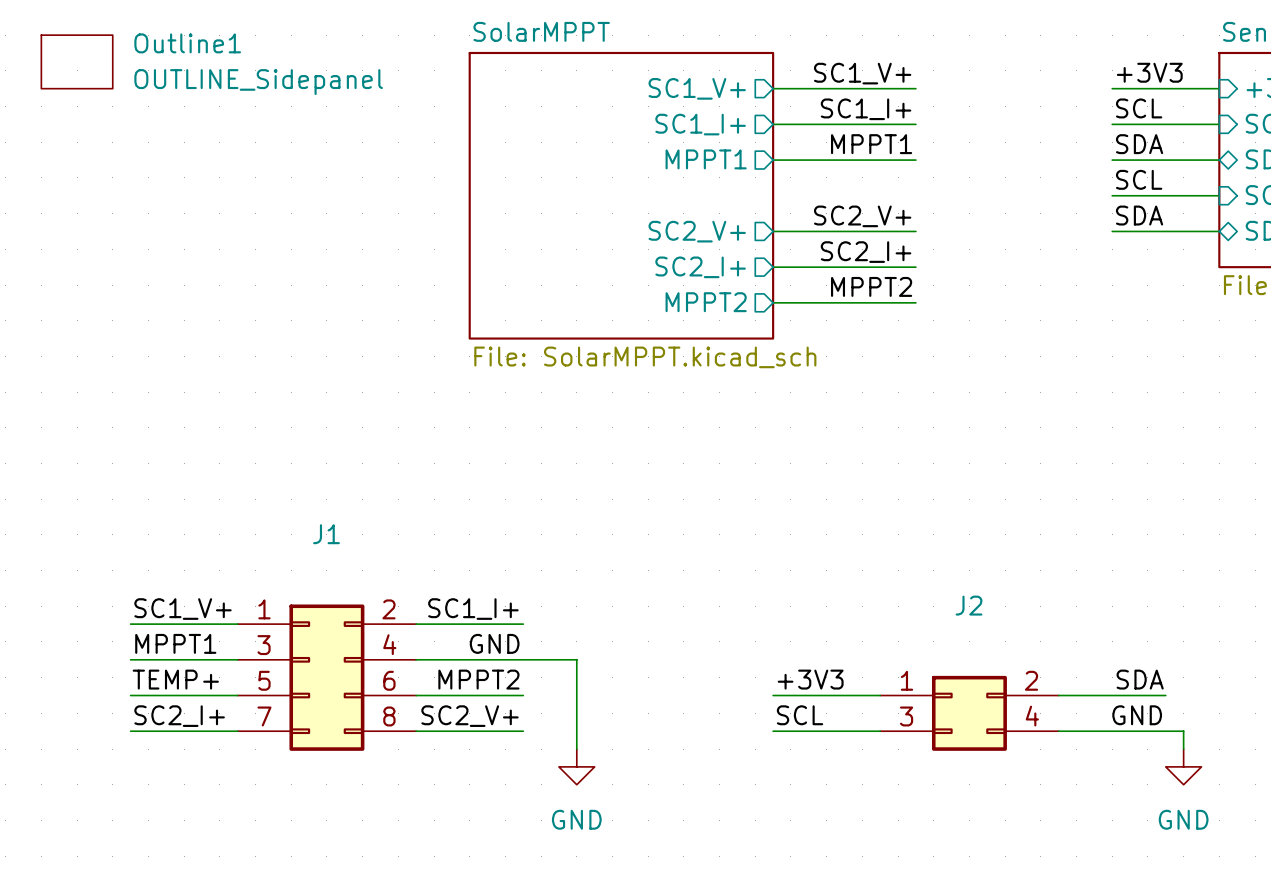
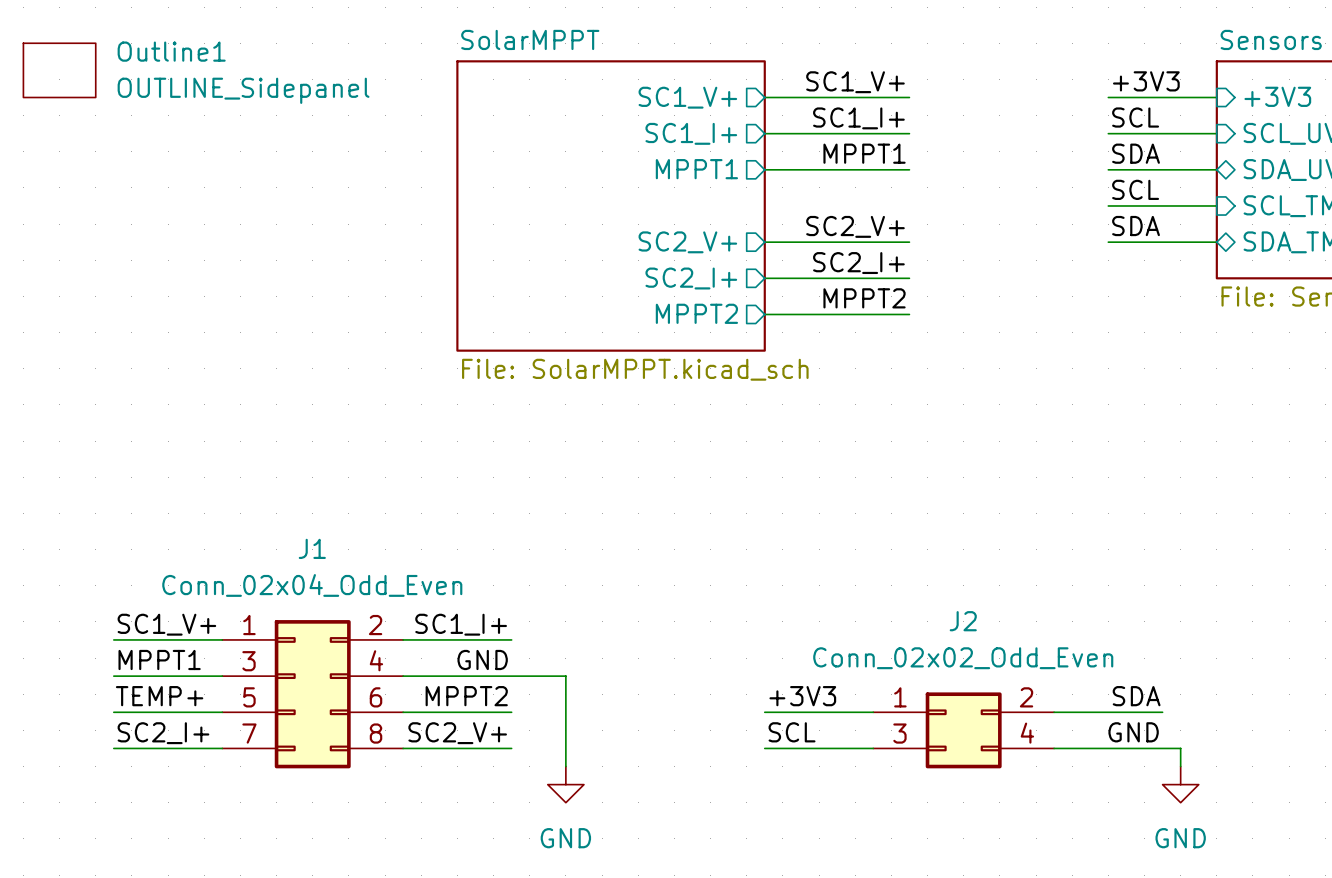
J1 value: none -> Conn_02x04_Odd_Even (312, 585)
J2 value: none -> Conn_02x02_Odd_Even (963, 658)

